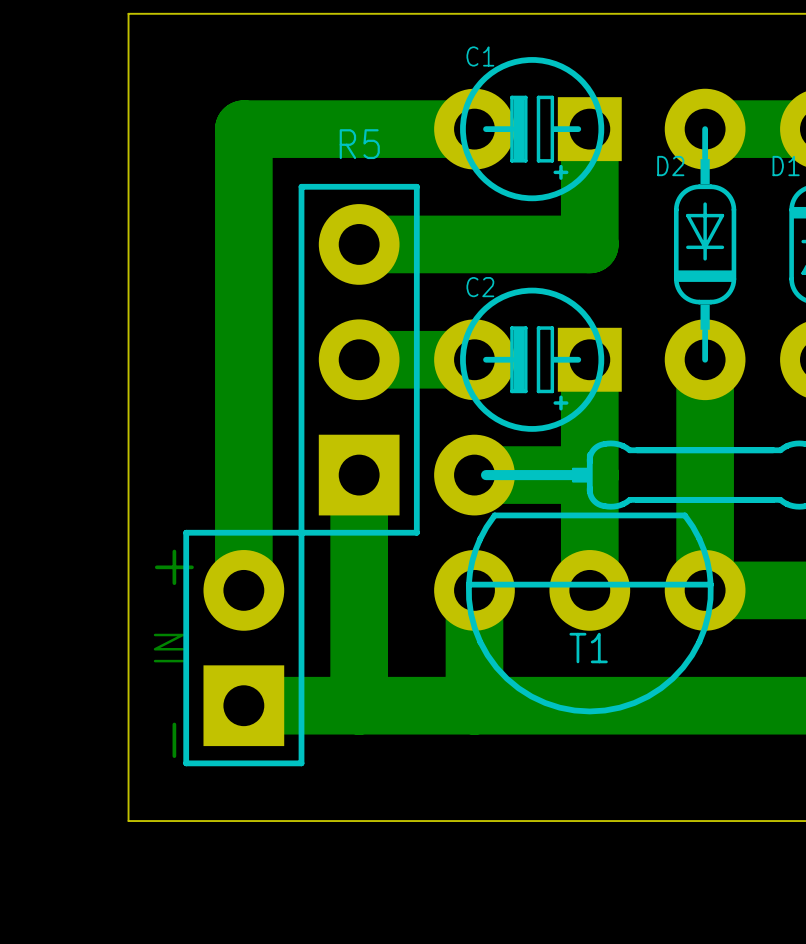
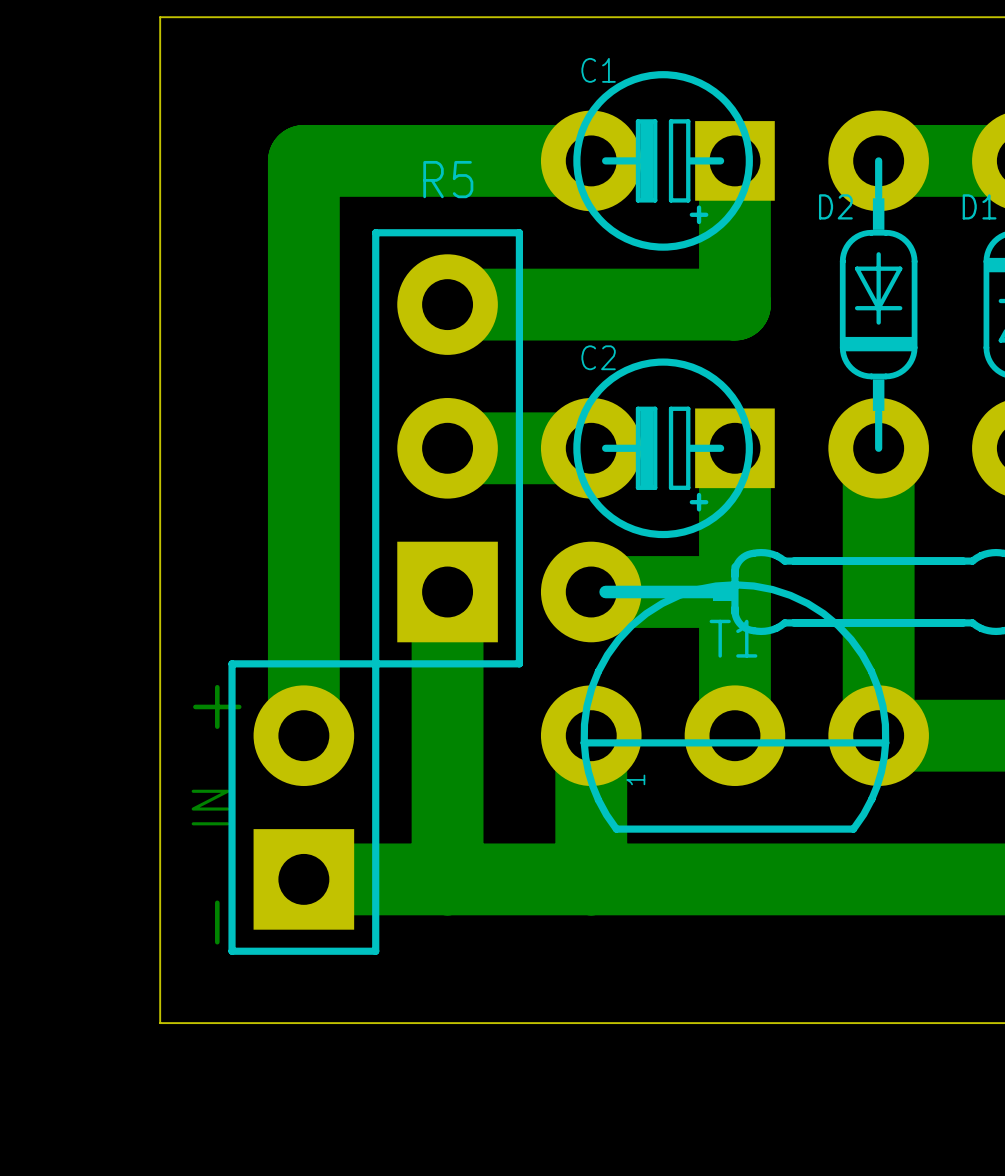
T1 footprint: [434, 512, 746, 715] -> [540, 581, 929, 833]

